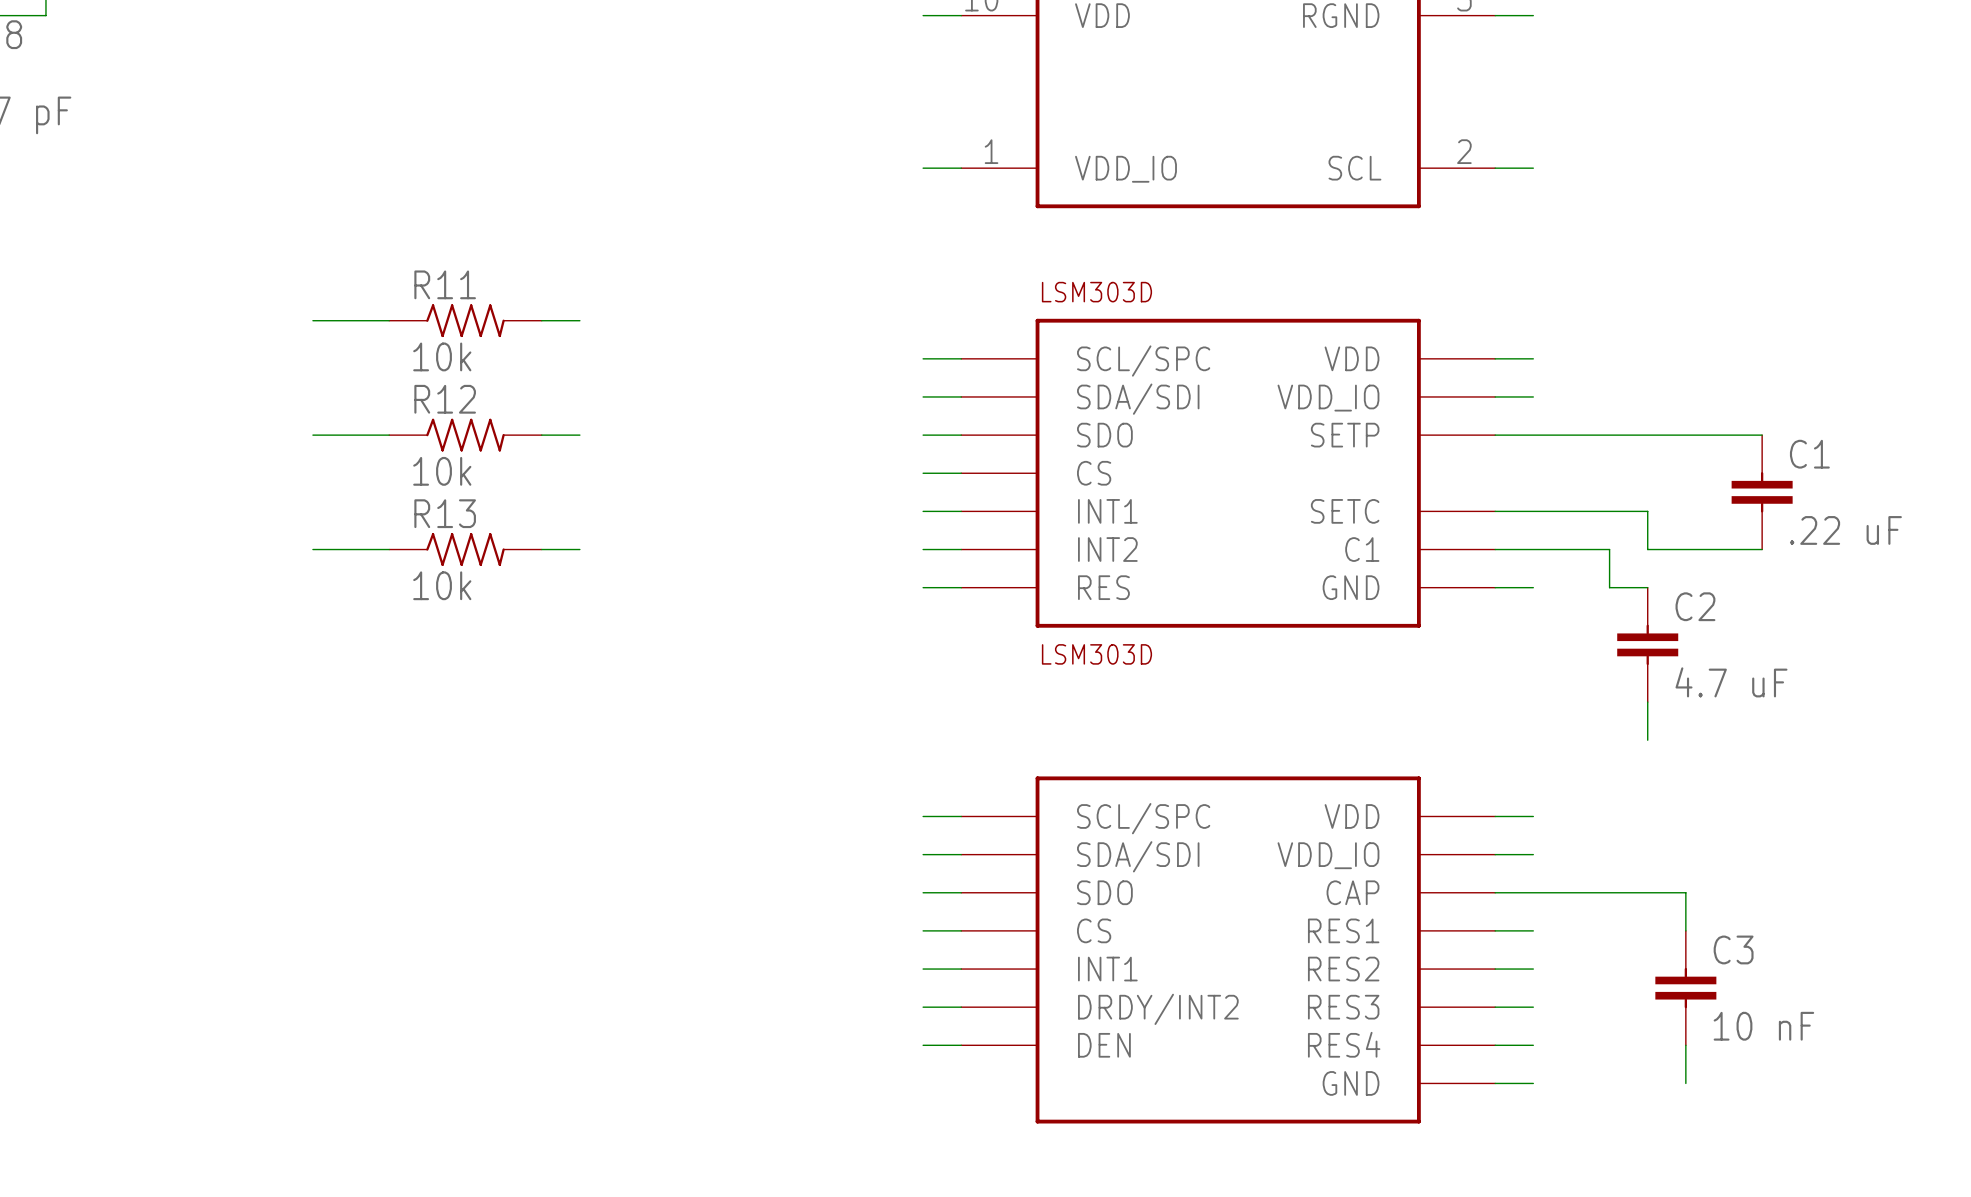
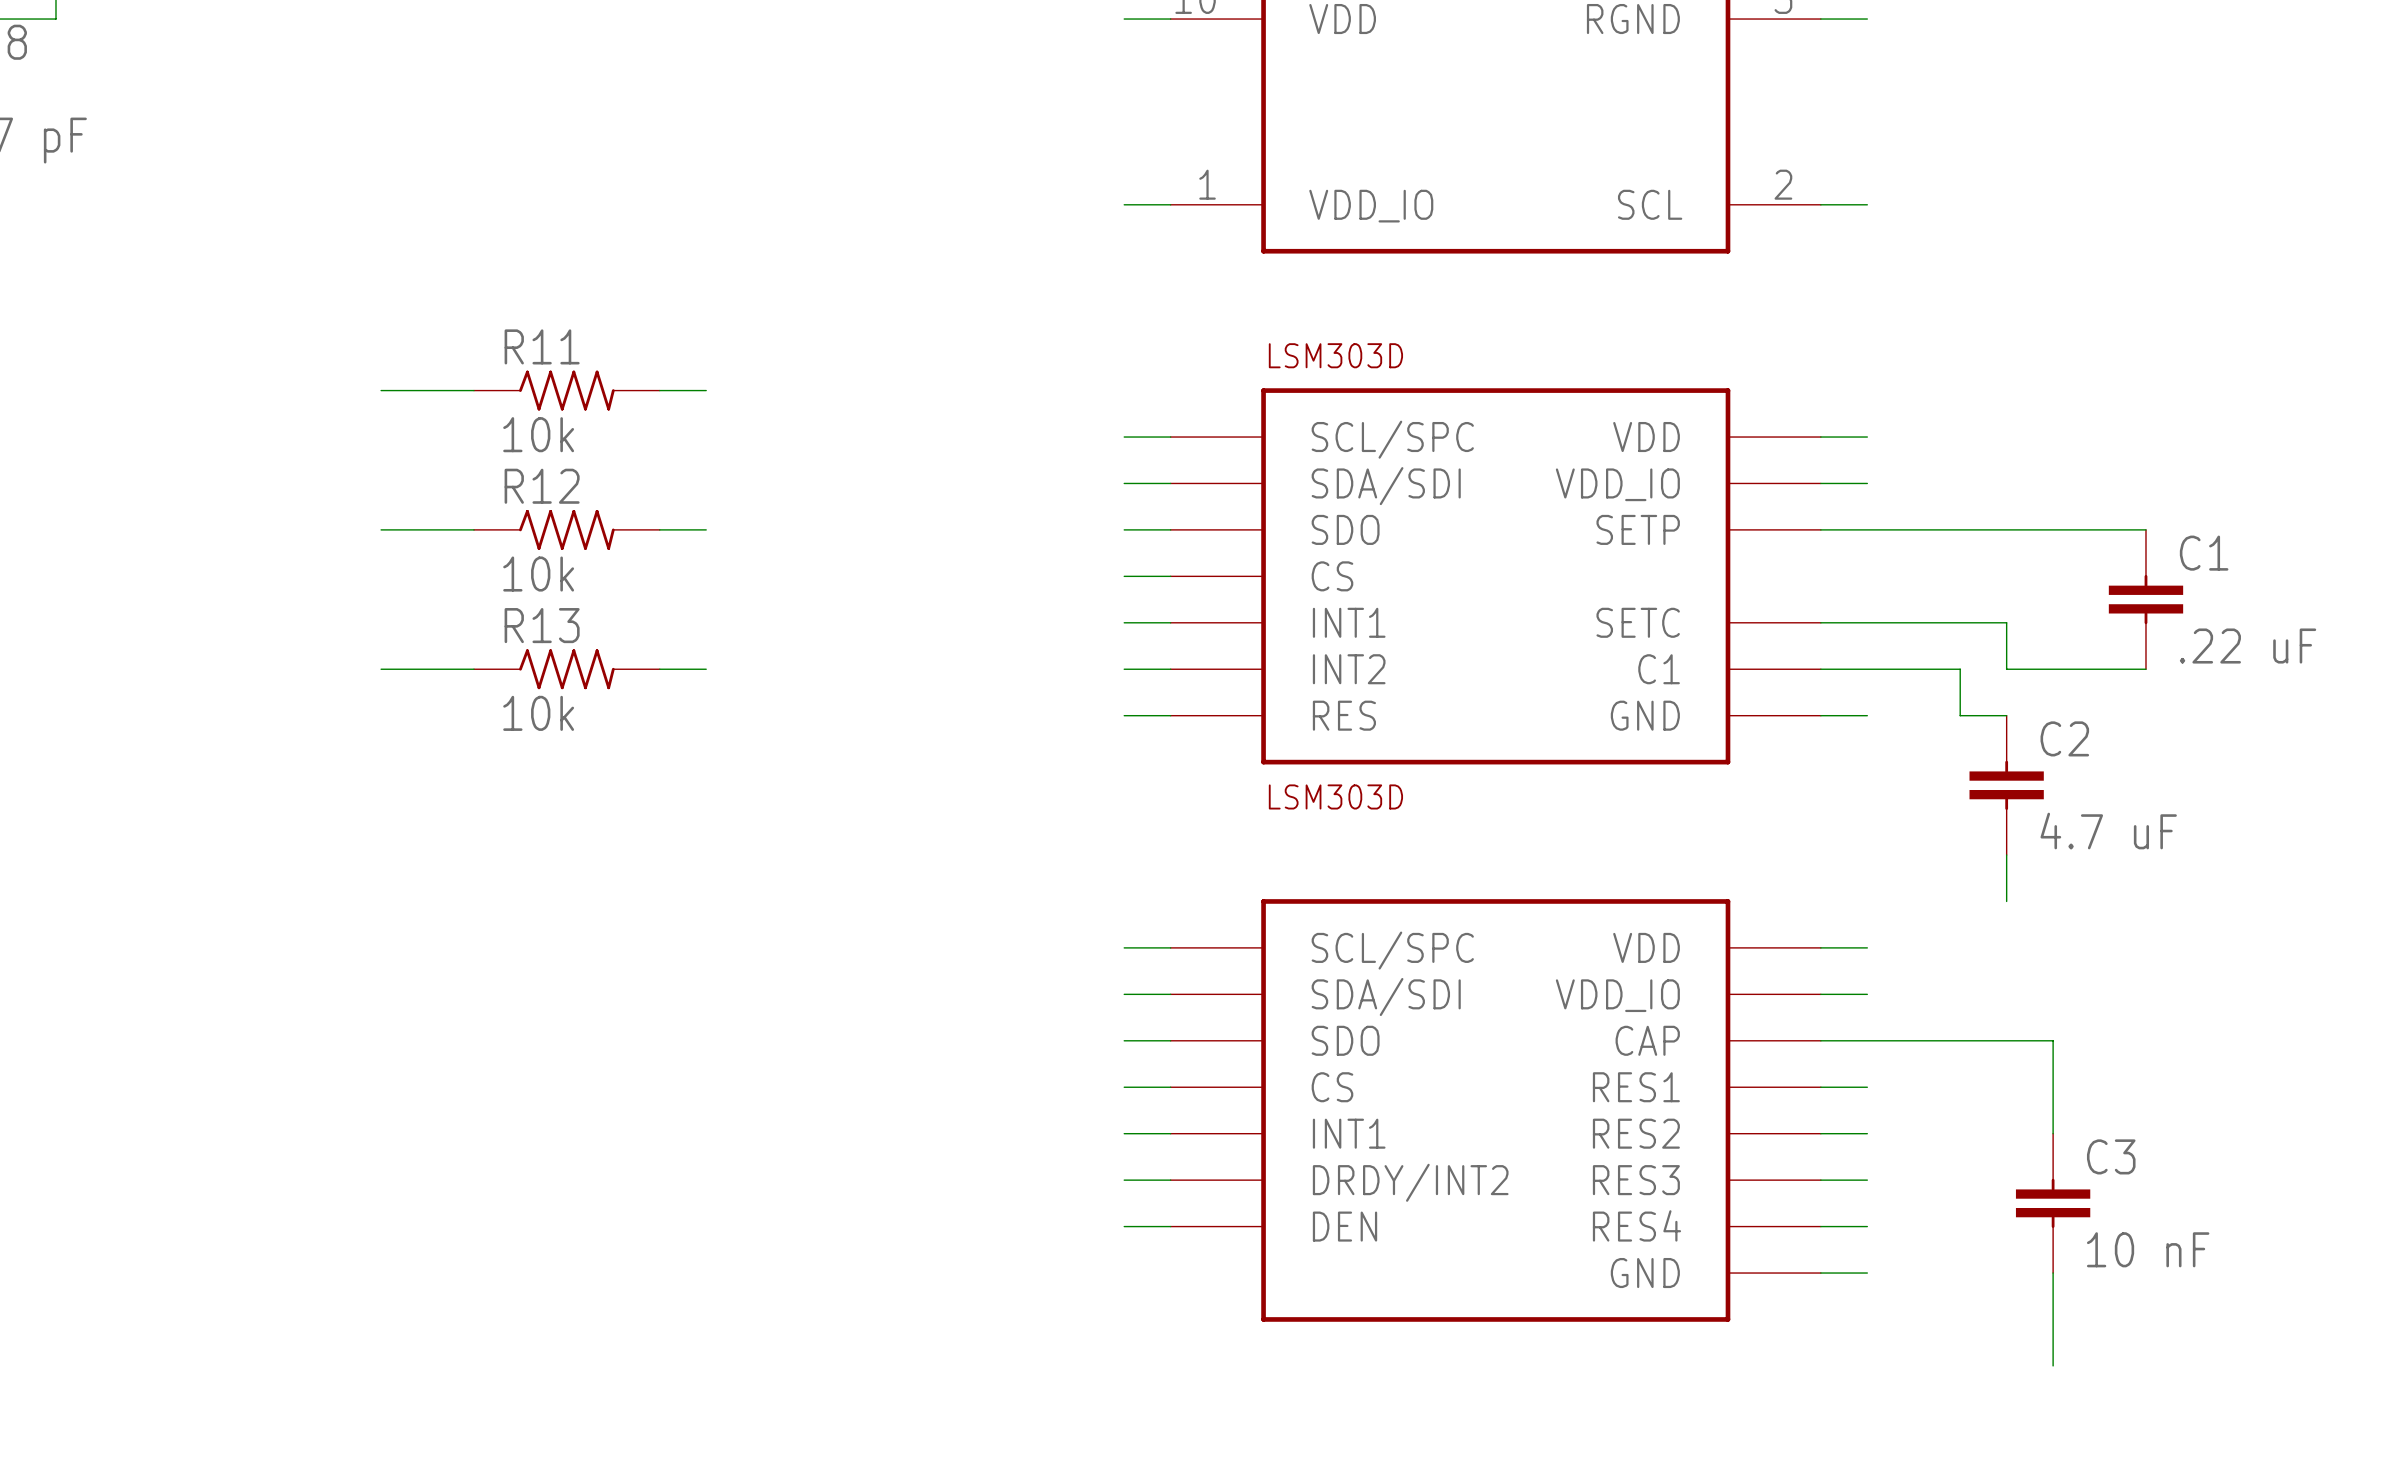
wire: (1533, 892) (1685, 892) -> (1867, 1040) (2053, 1040) (2053, 1087)
part position: (1228, 949) -> (1495, 1110)
wire: (923, 1045) (961, 1045) -> (1124, 947) (1170, 947)
wire: (1495, 1083) (1533, 1083) -> (1820, 947) (1867, 947)
wire: none -> (2053, 1319) (2053, 1365)

